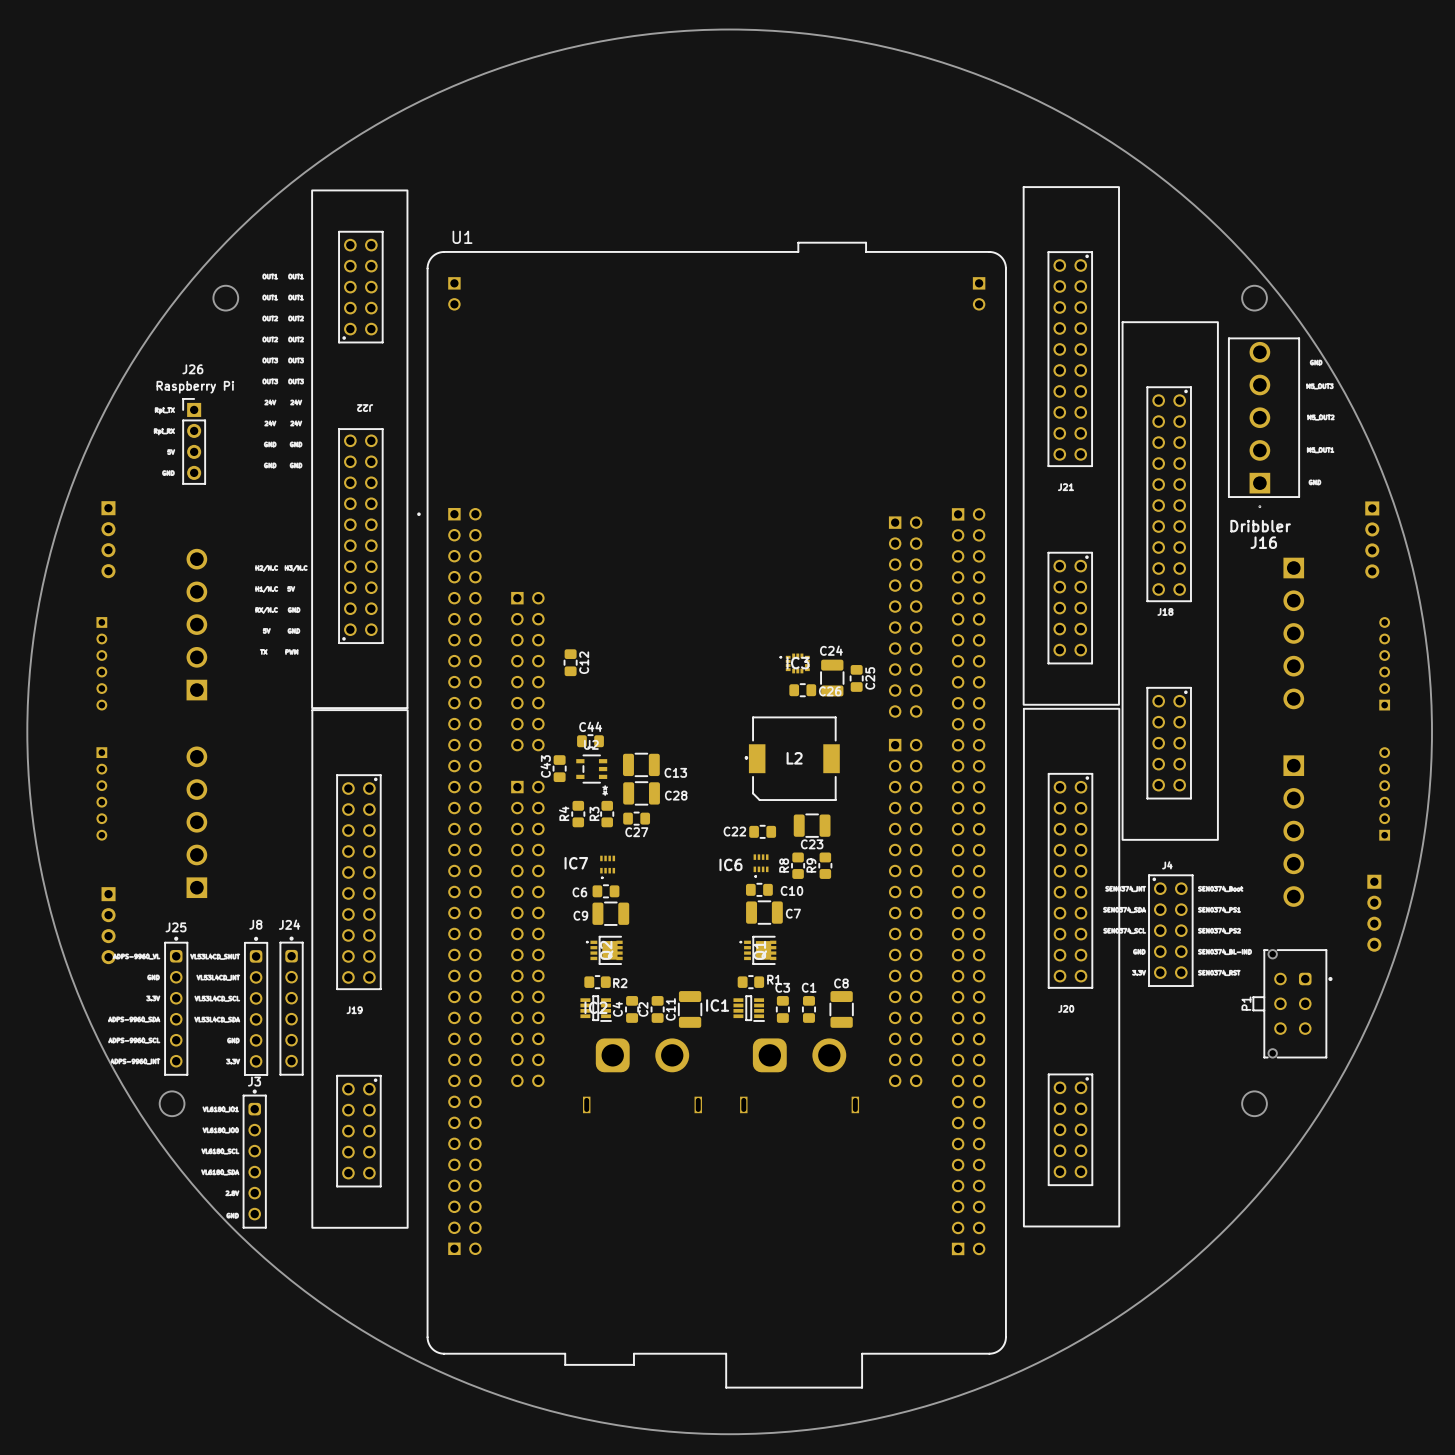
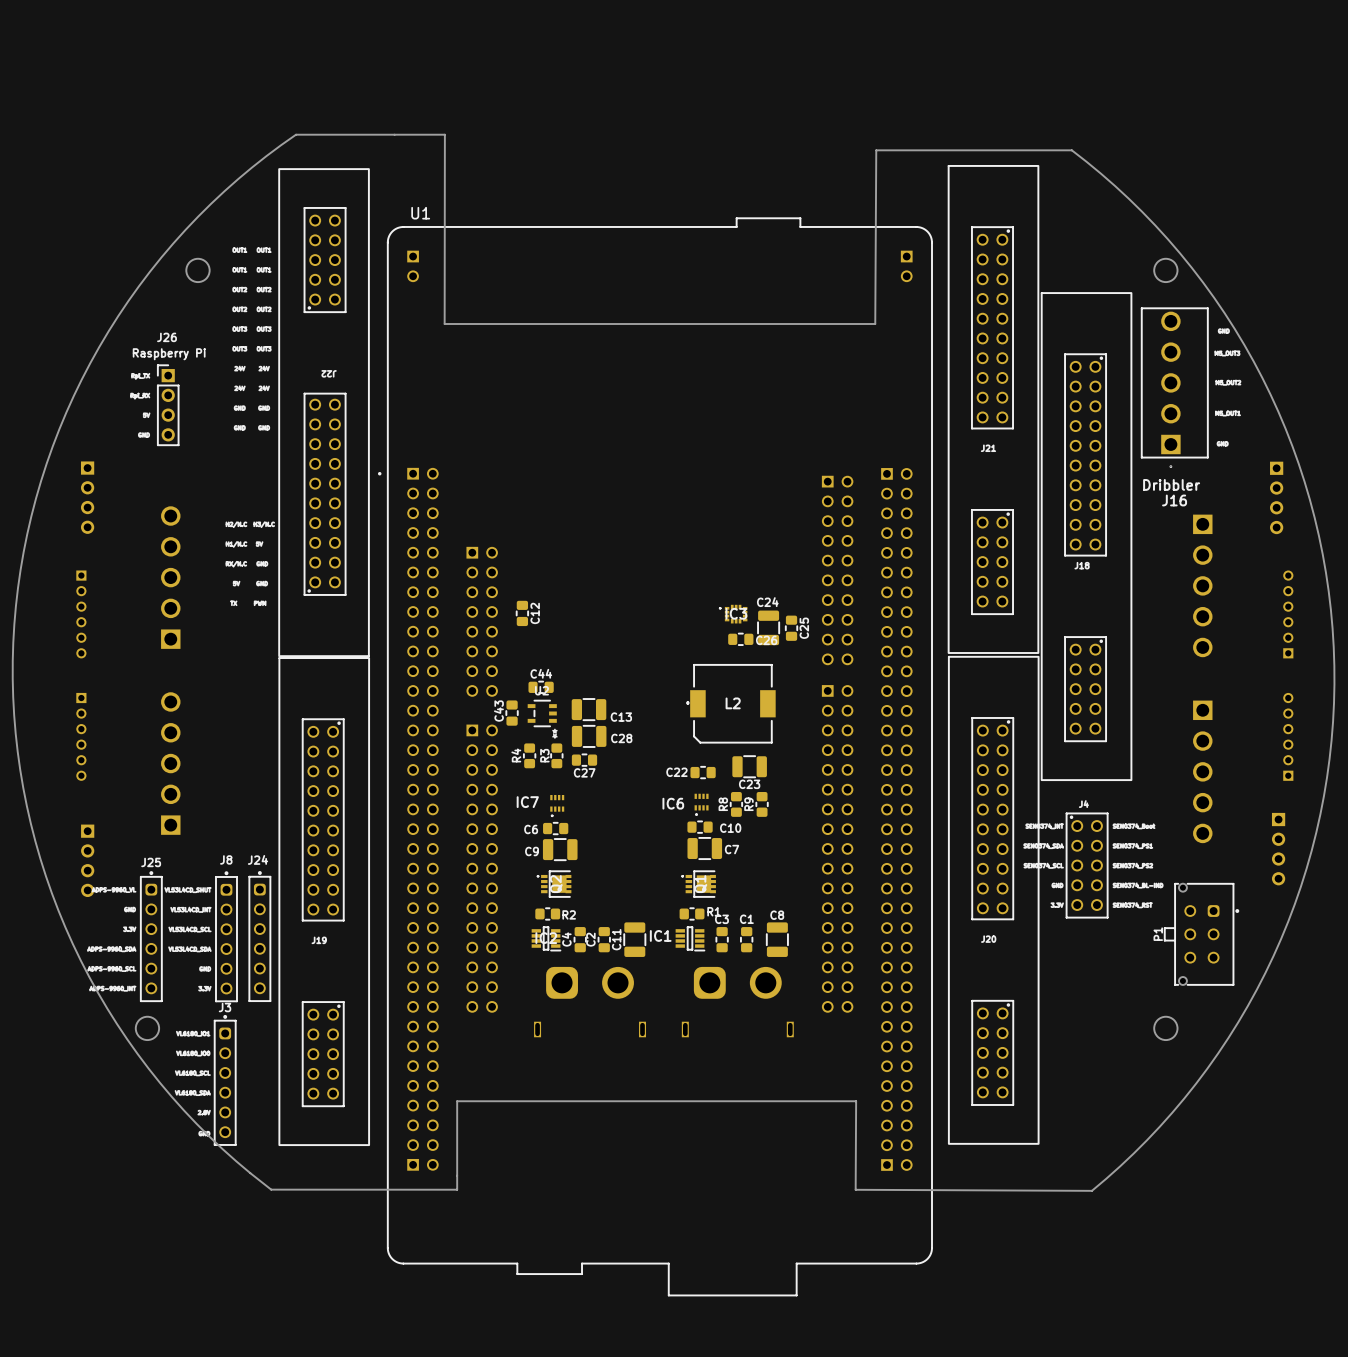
round board edge: [26, 28, 1433, 1436] -> none
board edge: none -> (296, 134) (444, 134) (444, 324) (875, 324) (876, 150) (1071, 150) (1115, 186) (1142, 211) (1180, 253) (1203, 282) (1234, 329) (1262, 377) (1285, 428) (1309, 499) (1325, 572) (1332, 628) (1334, 703) (1329, 759) (1316, 832) (1300, 886) (1281, 939) (1247, 1006) (1218, 1053) (1184, 1098) (1133, 1153) (1091, 1190) (855, 1189) (856, 1101) (457, 1101) (457, 1189) (271, 1189) (209, 1136) (184, 1110) (148, 1068) (117, 1024) (80, 960) (52, 893) (35, 841) (20, 769) (13, 697) (14, 624) (20, 569) (36, 498) (52, 446) (81, 379) (118, 316) (150, 271) (198, 216) (238, 179) (296, 134)

